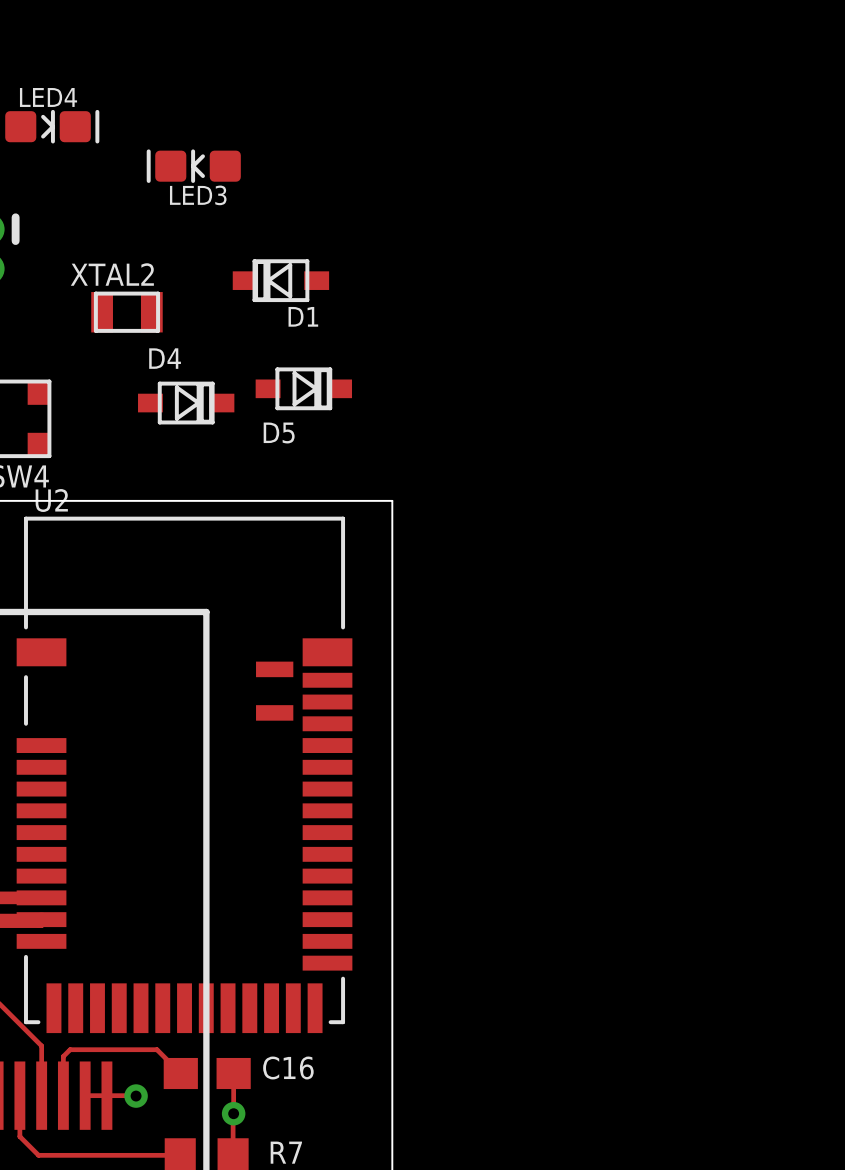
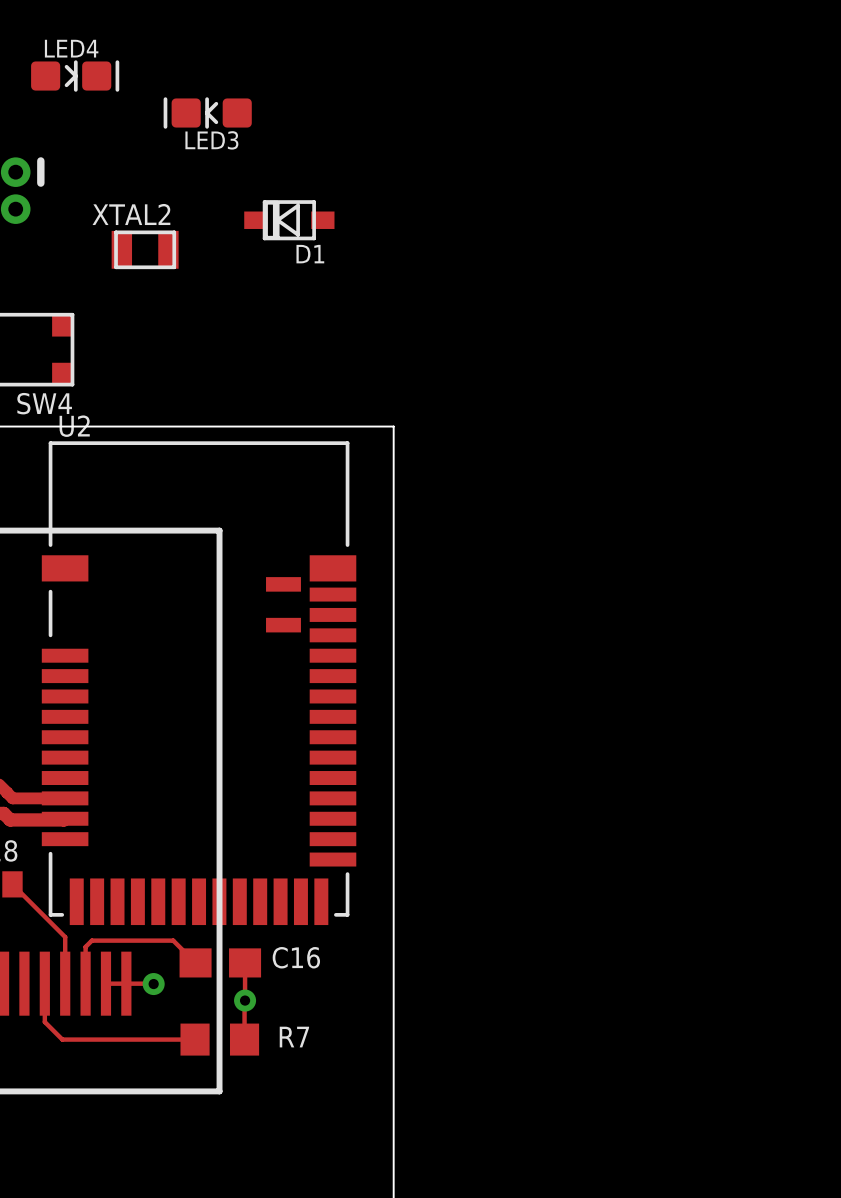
D5: (303, 388) -> none
D4: (186, 403) -> none

